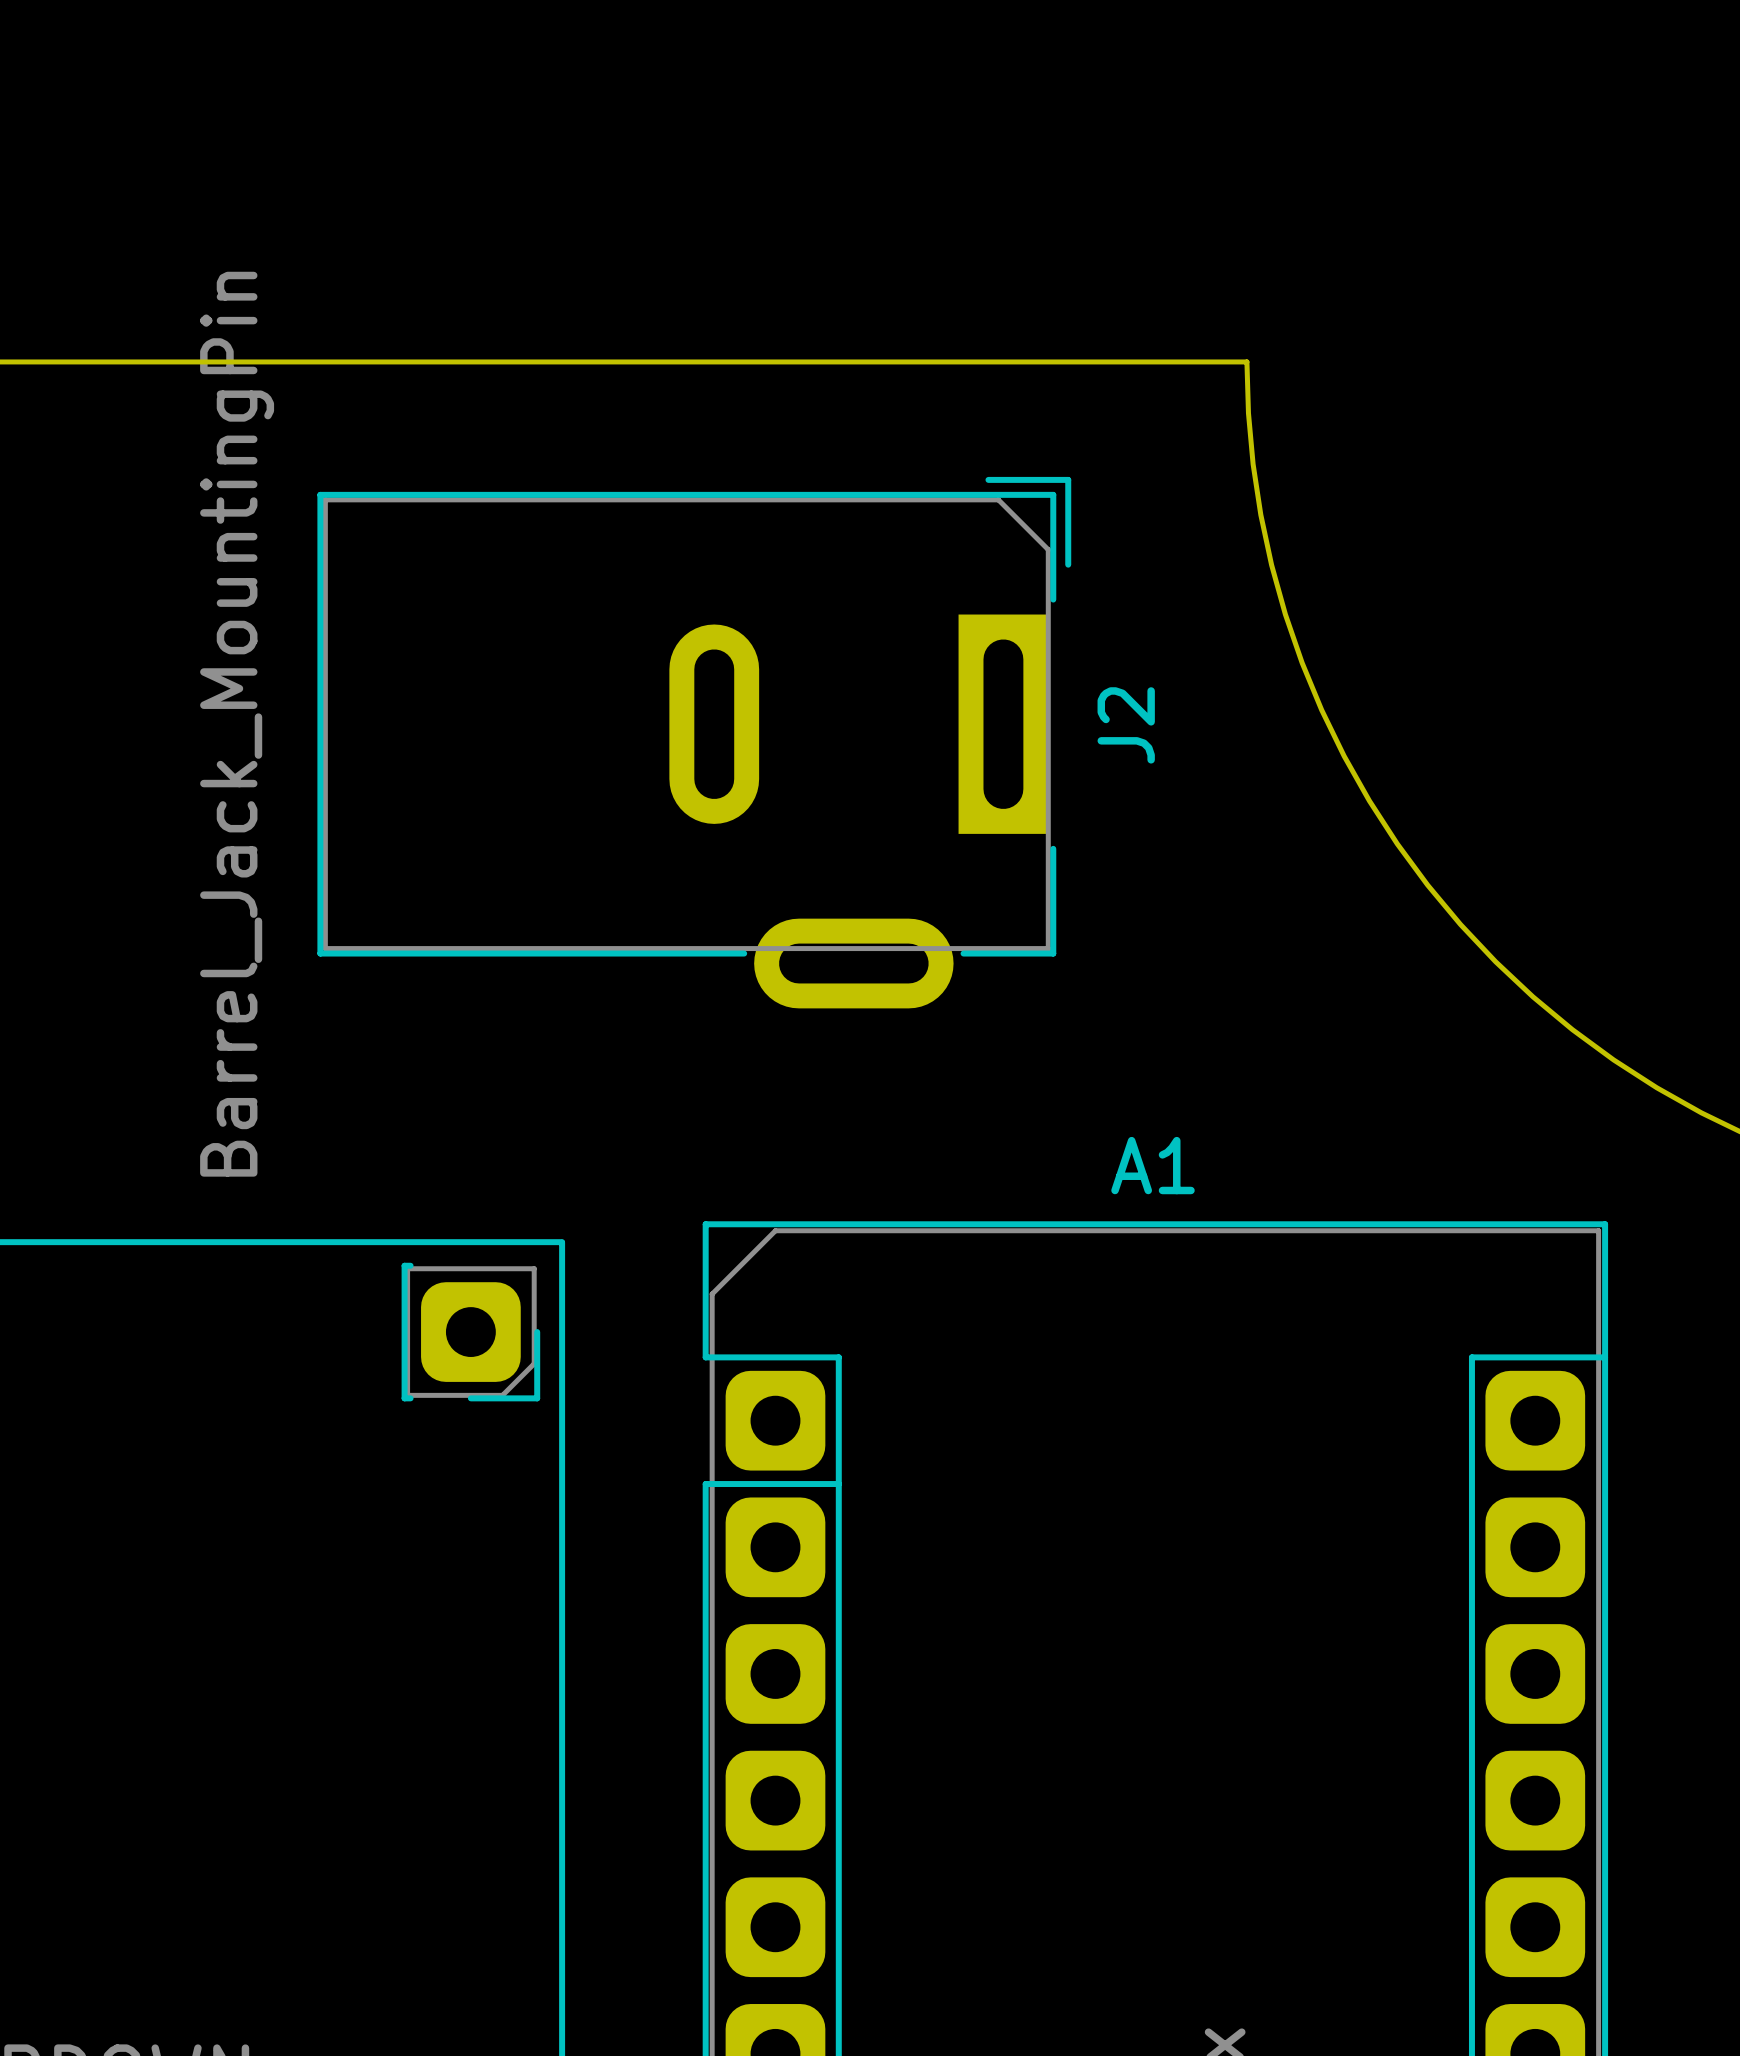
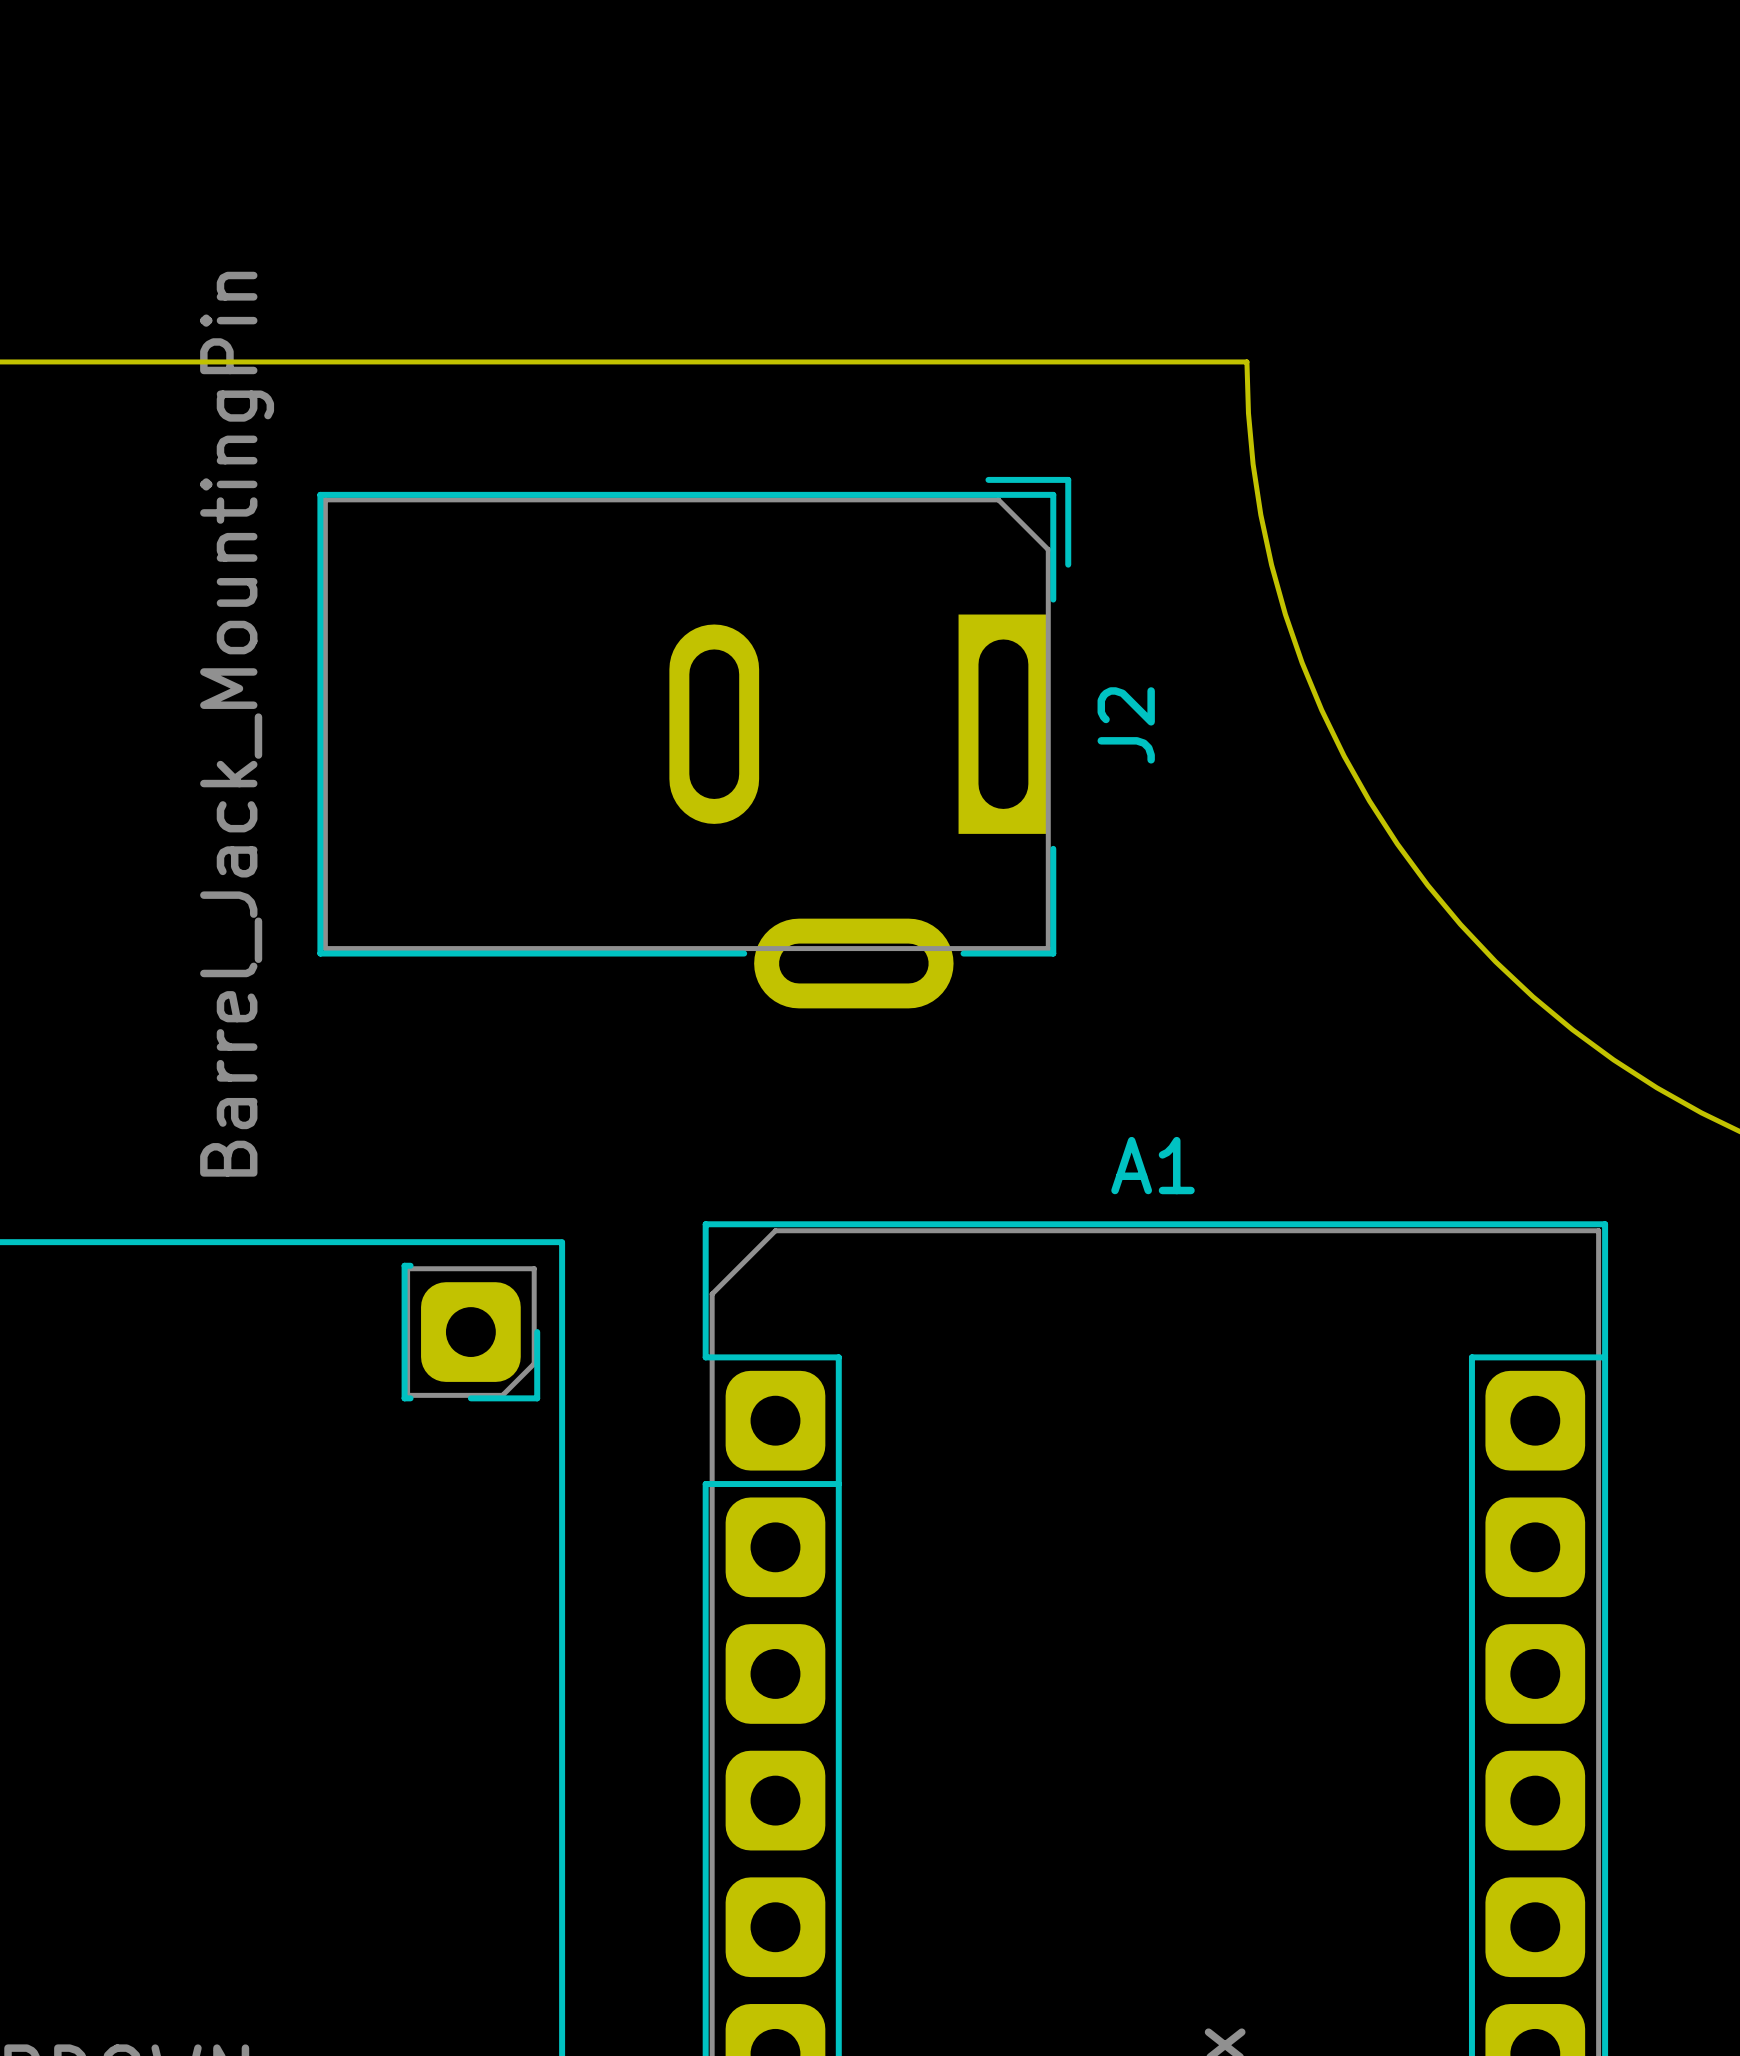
J2 footprint: [317, 476, 1072, 1009] -> [317, 476, 1072, 1009]

